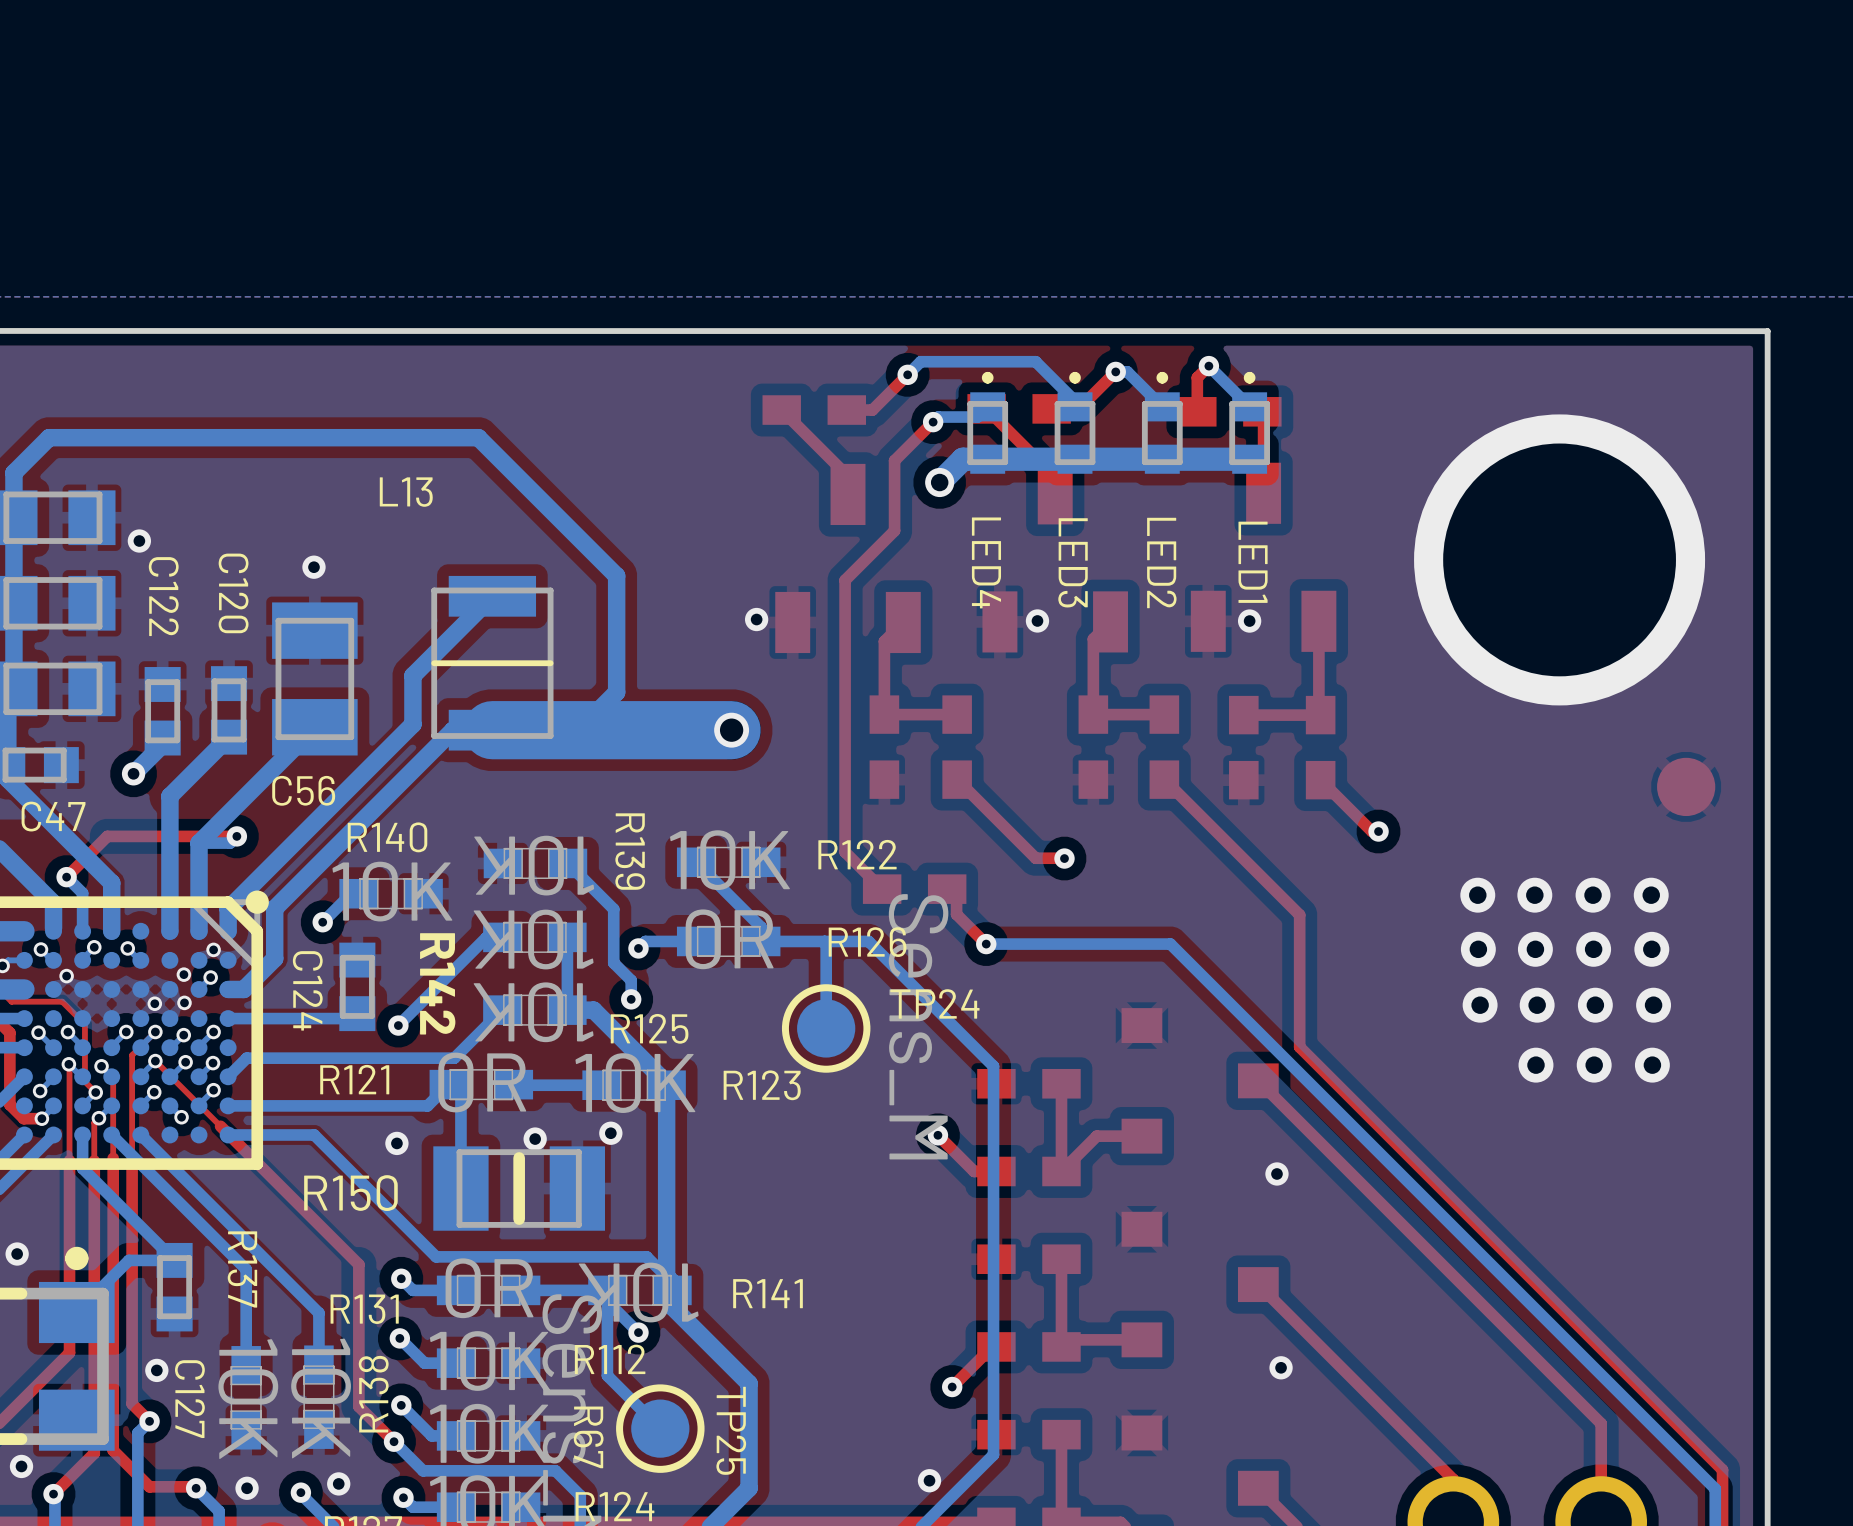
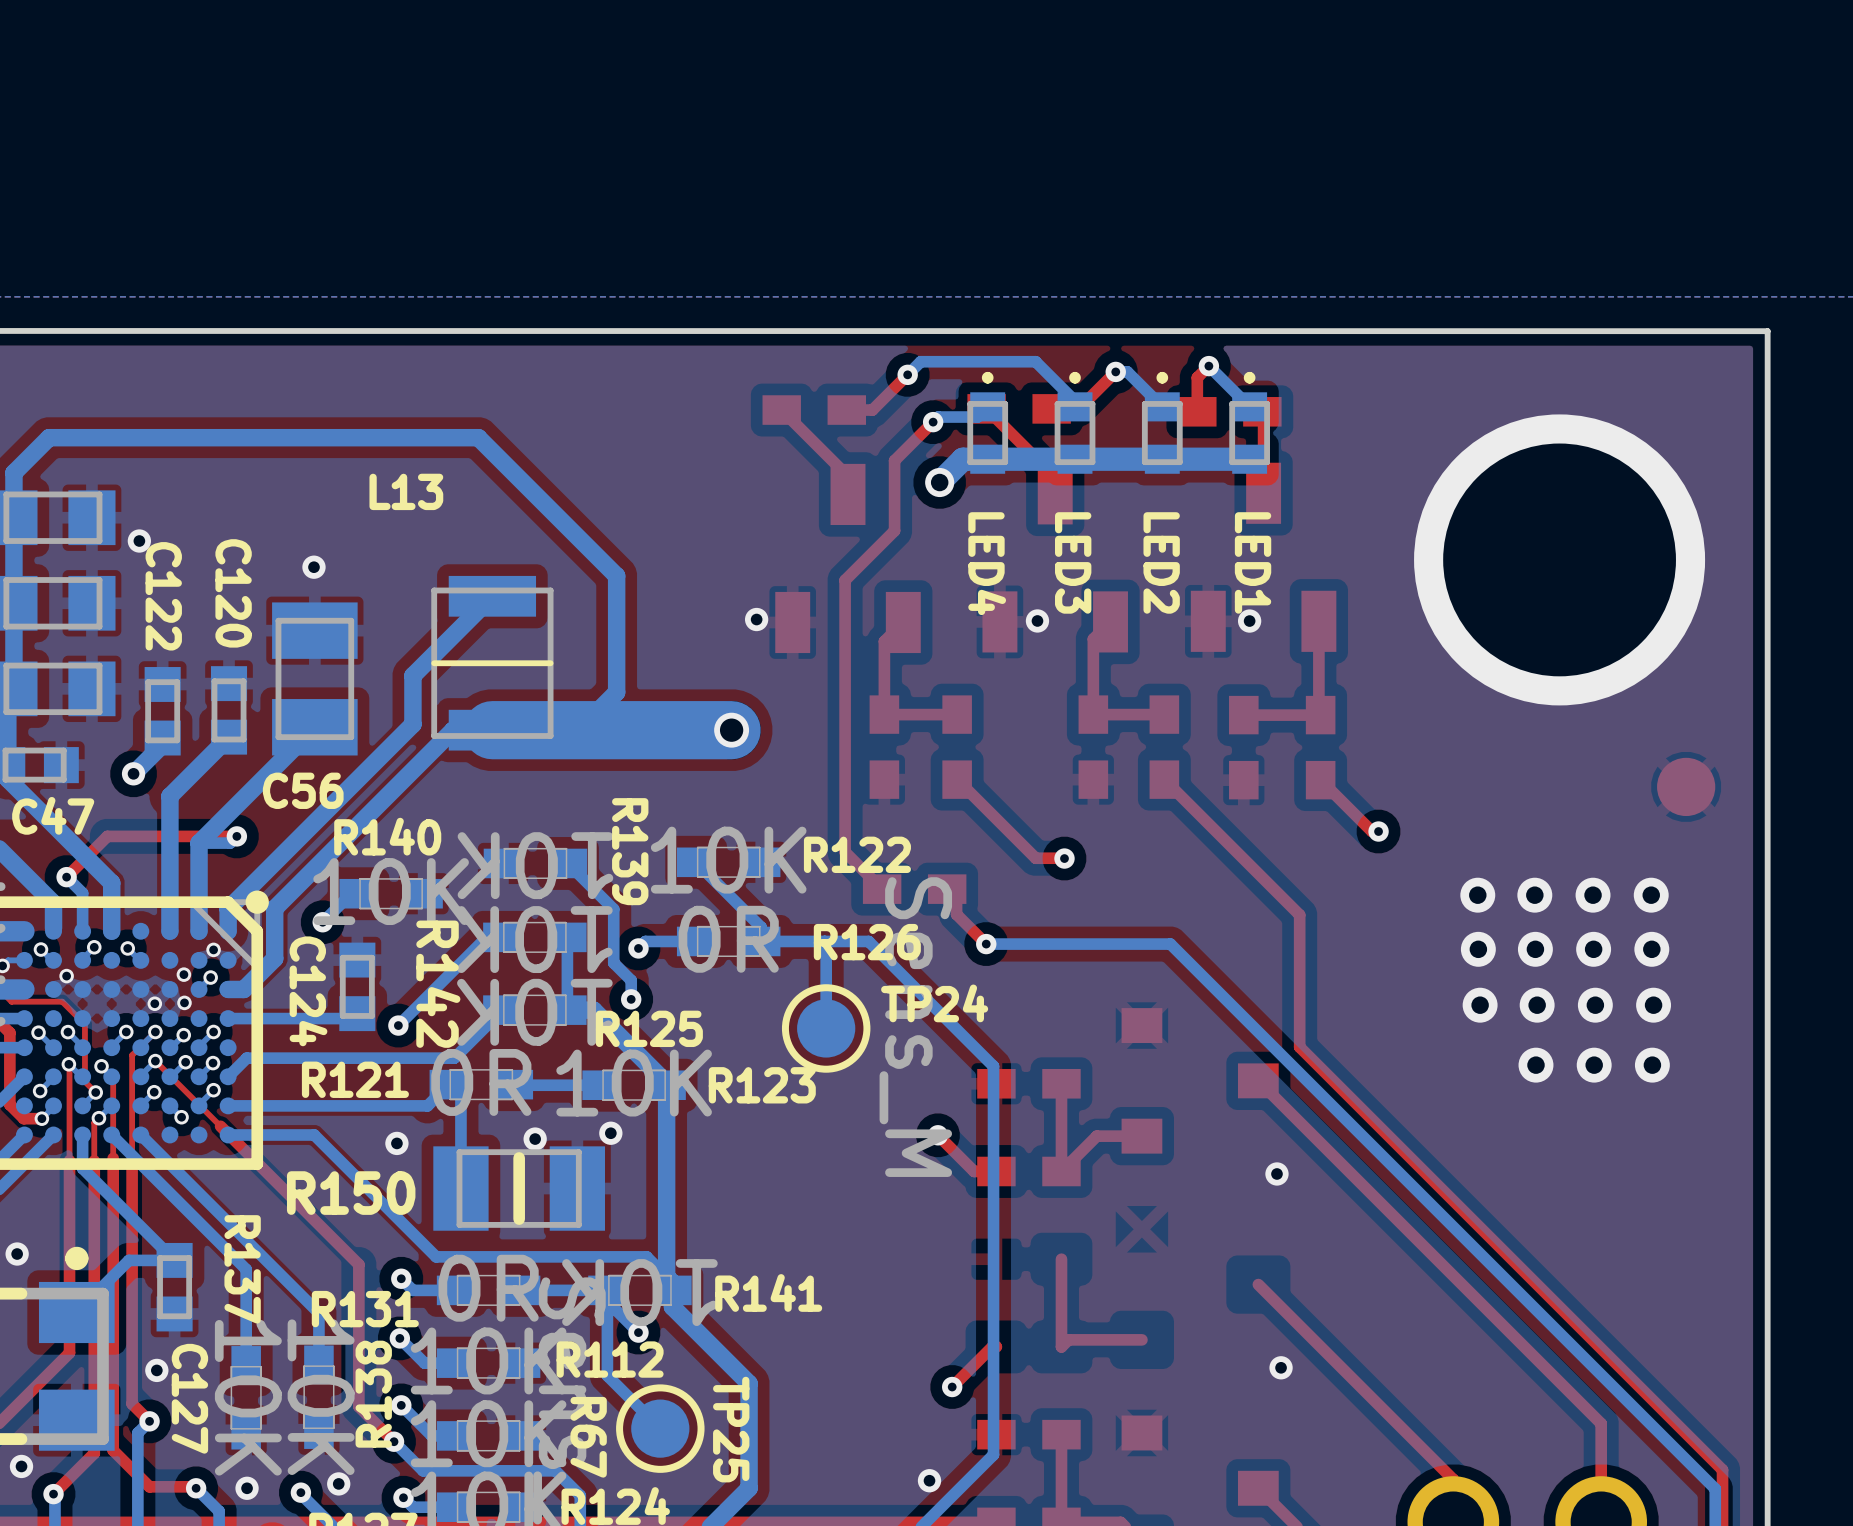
part: (1028, 1259) -> none
part: (1200, 1284) -> none
part: (1028, 1346) -> none

